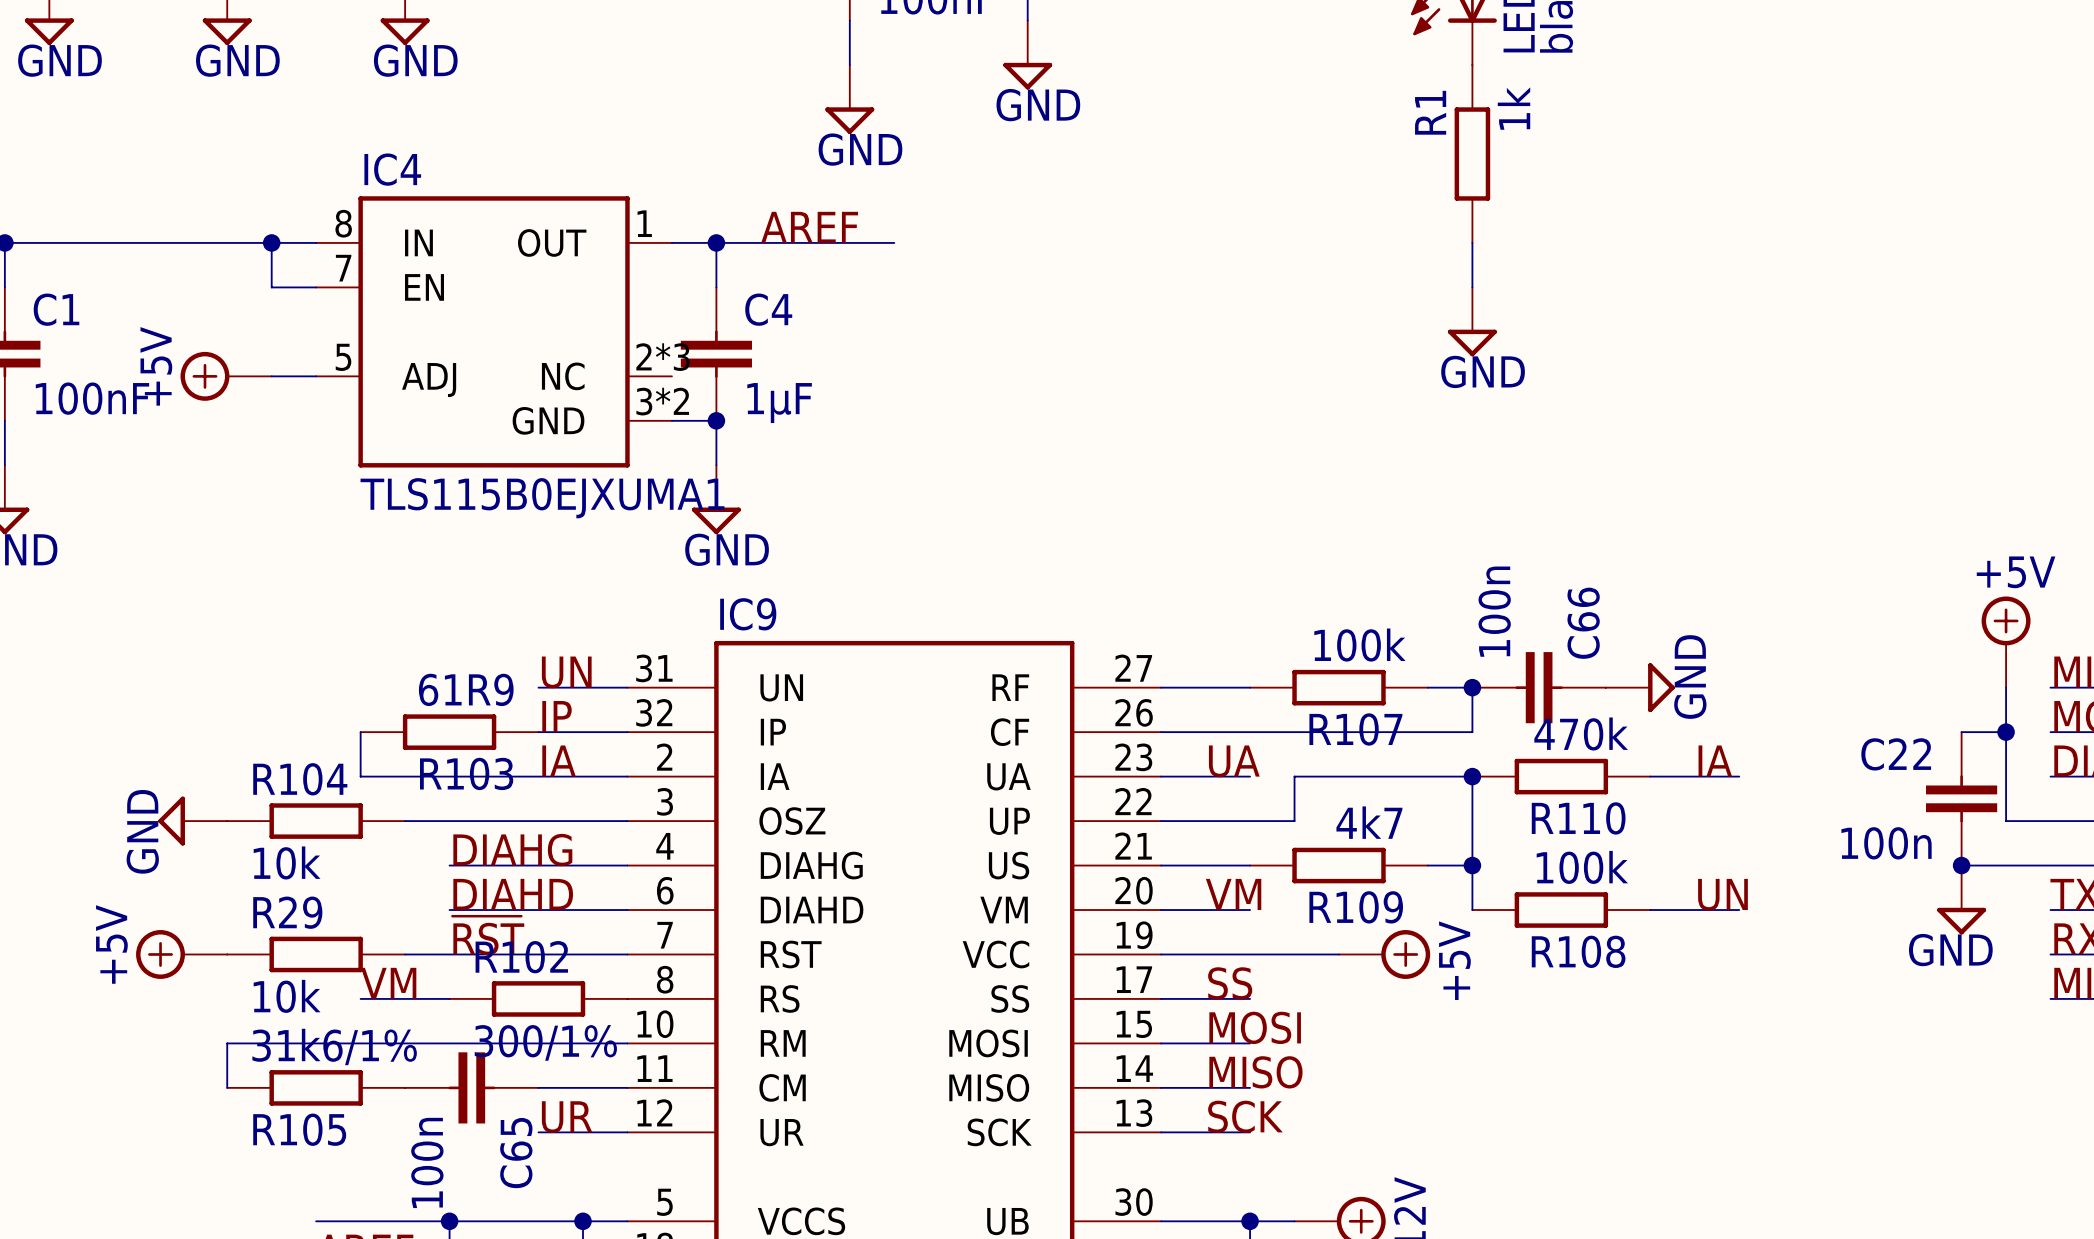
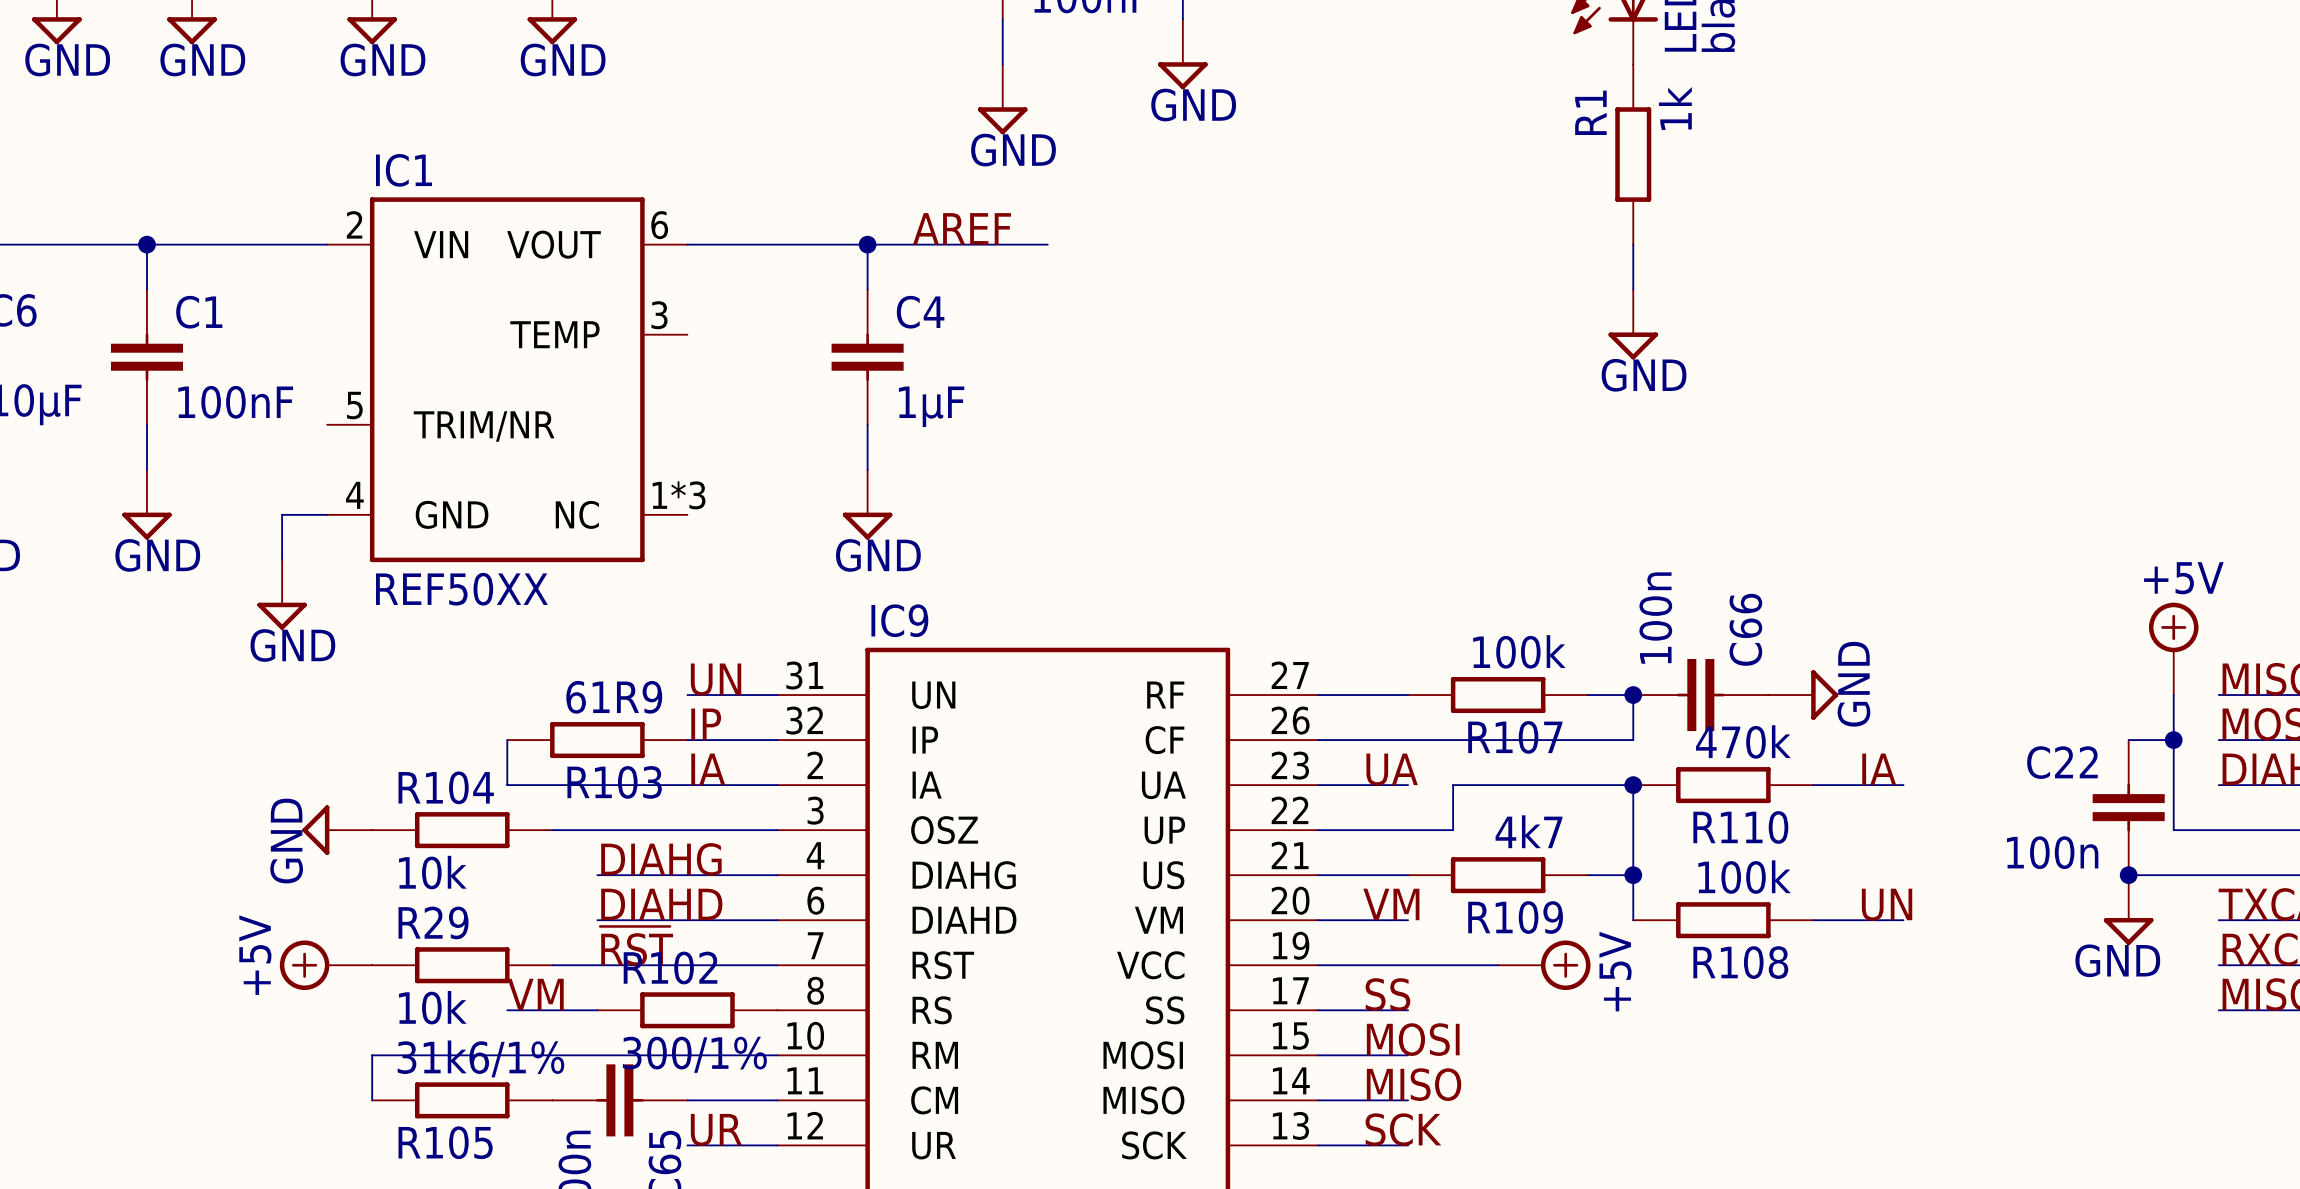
wire: (182, 242) (316, 242) -> (687, 244) (822, 244)
wire: (271, 242) (271, 287) (316, 287) -> none
junction: (271, 242) -> none
IC4: TLS115B0EJXUMA1 (494, 331) -> none
power symbol: +5V (226, 376) -> none
wire: (271, 376) (316, 376) -> none
IC1: none -> REF50XX (507, 379)
wire: (671, 420) (716, 420) -> none
junction: (716, 420) -> none
wire: none -> (327, 514) (282, 514) (282, 559)
power symbol: none -> GND (282, 594)

